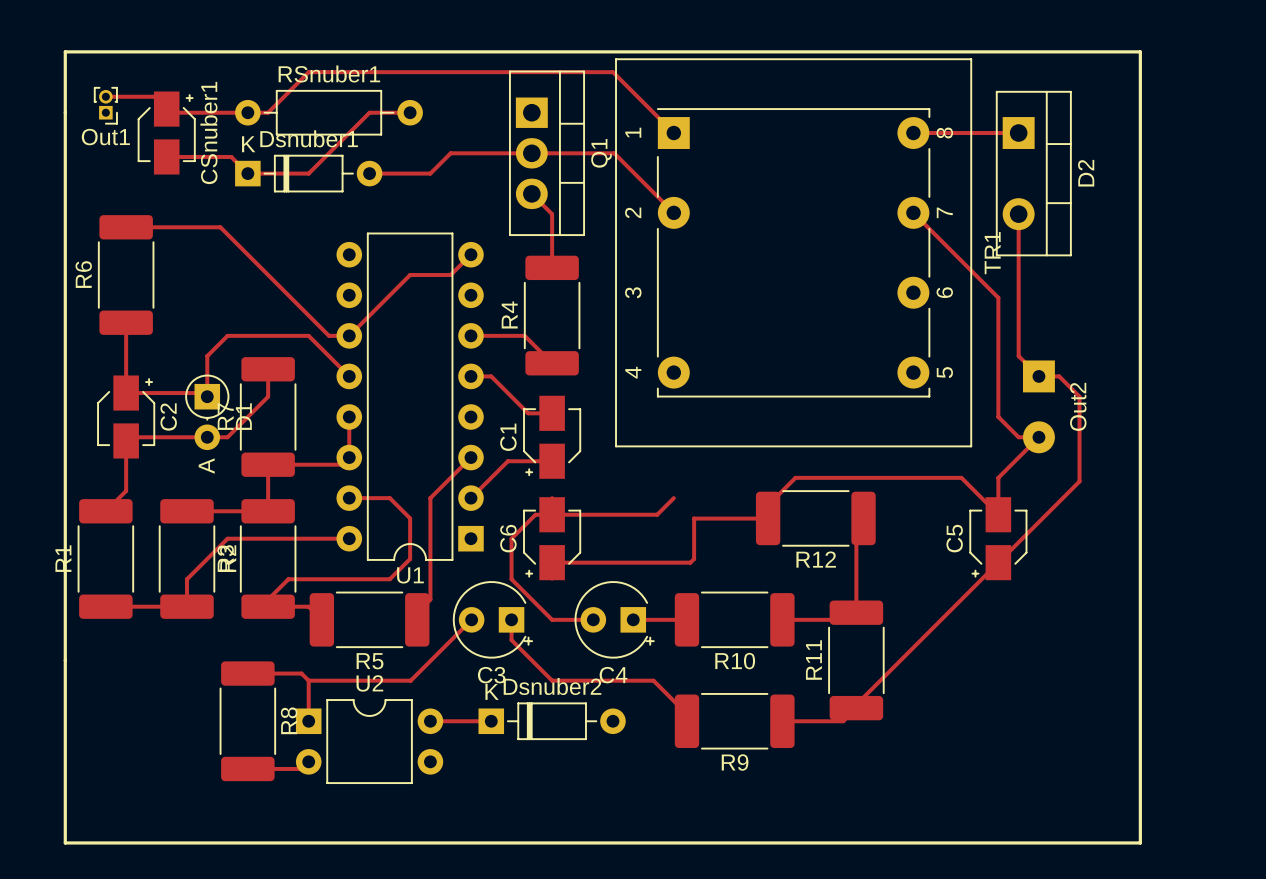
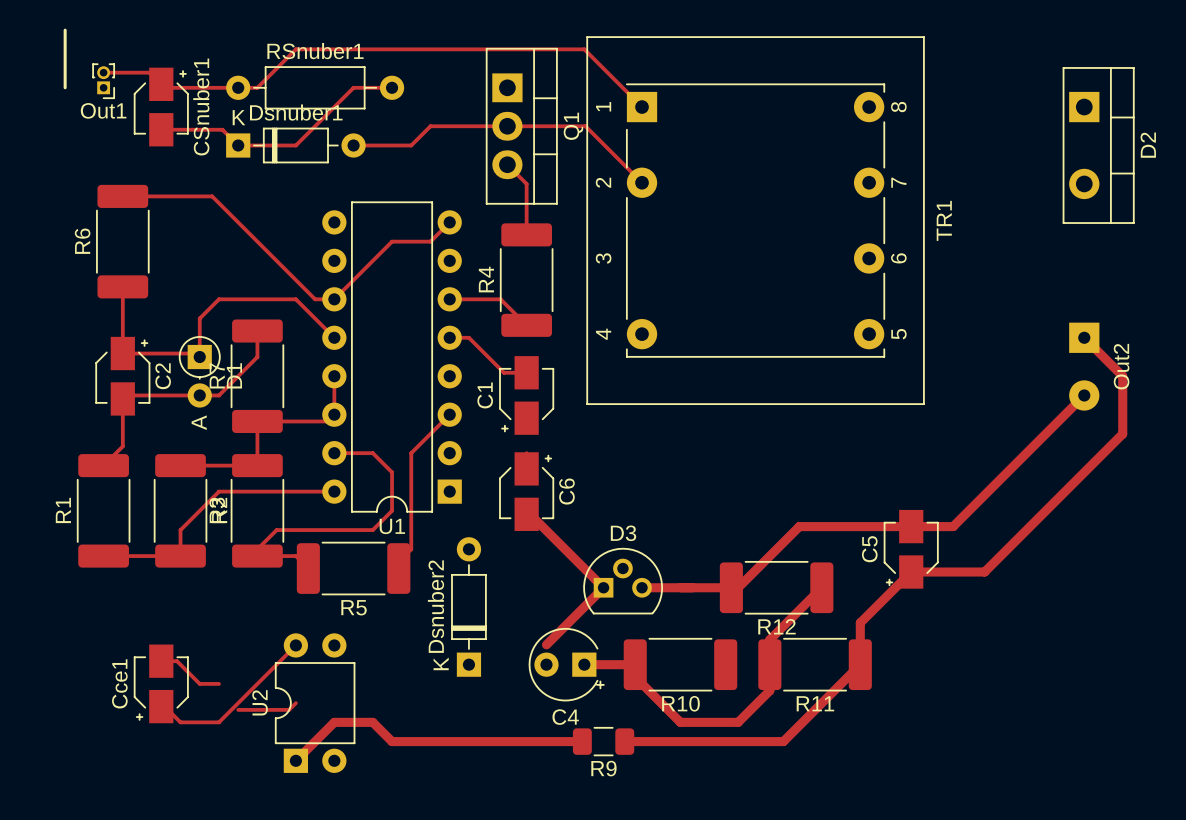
line: (65, 51) (1140, 51) (1140, 842) (65, 842) (65, 112) -> none
track: (913, 133) (1018, 133) -> none
D2 position: (1033, 173) -> (1098, 145)
track: (913, 212) (998, 297) (998, 416) (1018, 437) (1038, 437) (998, 477) (998, 514) (961, 477) (795, 477) (768, 505) (768, 518) (775, 525) -> none
track: (1018, 214) (1018, 356) (1038, 376) (1059, 376) (1079, 396) (1079, 481) (856, 704) (856, 708) (843, 721) (782, 721) -> none
track: none -> (1084, 337) (1122, 376) (1122, 433) (984, 572) (911, 572) (860, 622) (860, 664) (783, 741) (624, 741)
Out2 position: (1038, 406) -> (1084, 366)
track: none -> (1084, 395) (953, 526) (799, 526) (738, 587) (642, 587) (692, 587)
track: (552, 461) (507, 461) (470, 498) -> none
track: (673, 498) (657, 514) (535, 514) (511, 538) (511, 579) (552, 619) (593, 619) -> none
track: (767, 518) (694, 518) (694, 558) (690, 562) (555, 562) -> (546, 644) (603, 587) (530, 514)
R12 position: (815, 518) -> (776, 587)
track: (863, 518) (856, 525) (856, 612) (849, 619) (782, 619) -> none
C6 rotation: 0° (552, 538) -> 180° (526, 491)
C5 position: (998, 538) -> (911, 549)
track: (471, 619) (410, 680) (308, 680) -> none
C3: (492, 619) -> none
track: (511, 619) (511, 640) (552, 680) (653, 680) (686, 714) (686, 721) -> none
C4 position: (614, 619) -> (566, 664)
track: (633, 619) (686, 619) -> none
R10 position: (734, 619) -> (680, 664)
D3: none -> (623, 581)
track: none -> (821, 587) (769, 639) (769, 690) (738, 722) (680, 722) (635, 677) (635, 664) (584, 664)
R11 name position: R11 (813, 660) -> R11 (815, 703)
R11 rotation: 0° (856, 660) -> 90° clockwise (815, 664)
track: (247, 673) (301, 673) (308, 680) -> none
track: (308, 680) (308, 721) -> none
R9 footprint: [674, 692, 795, 750] -> [572, 726, 635, 757]
track: none -> (295, 645) (218, 722) (180, 722) (164, 706) (161, 706)
track: none -> (161, 661) (177, 661) (199, 683) (218, 683)
R8: (247, 721) -> none
track: (430, 721) (491, 721) -> none
Dsnuber2 rotation: 0° (552, 721) -> 90° counterclockwise (468, 606)
Cce1: none -> (161, 683)
U2 rotation: 0° (369, 741) -> 90° counterclockwise (315, 703)
track: none -> (582, 741) (392, 741) (372, 722) (334, 722) (295, 760)

